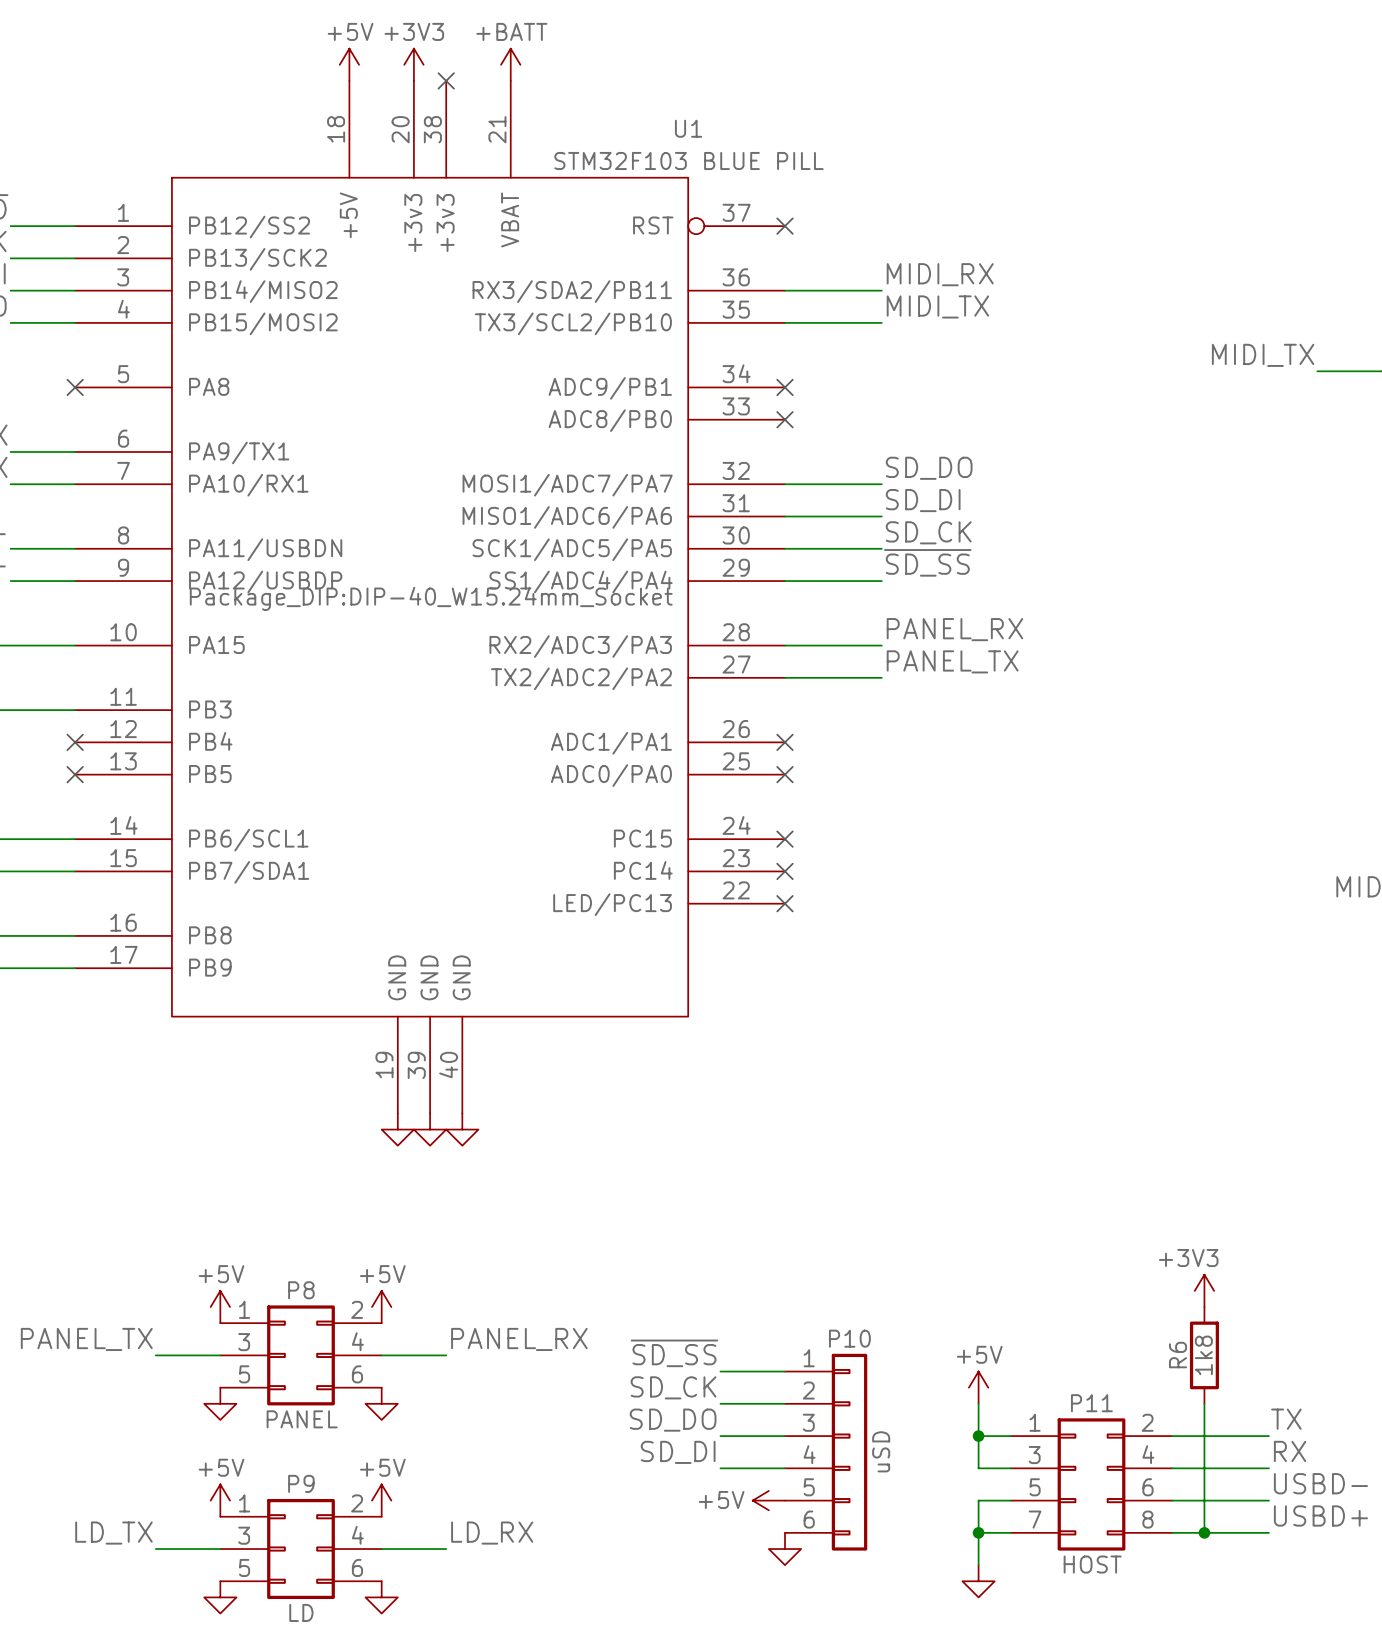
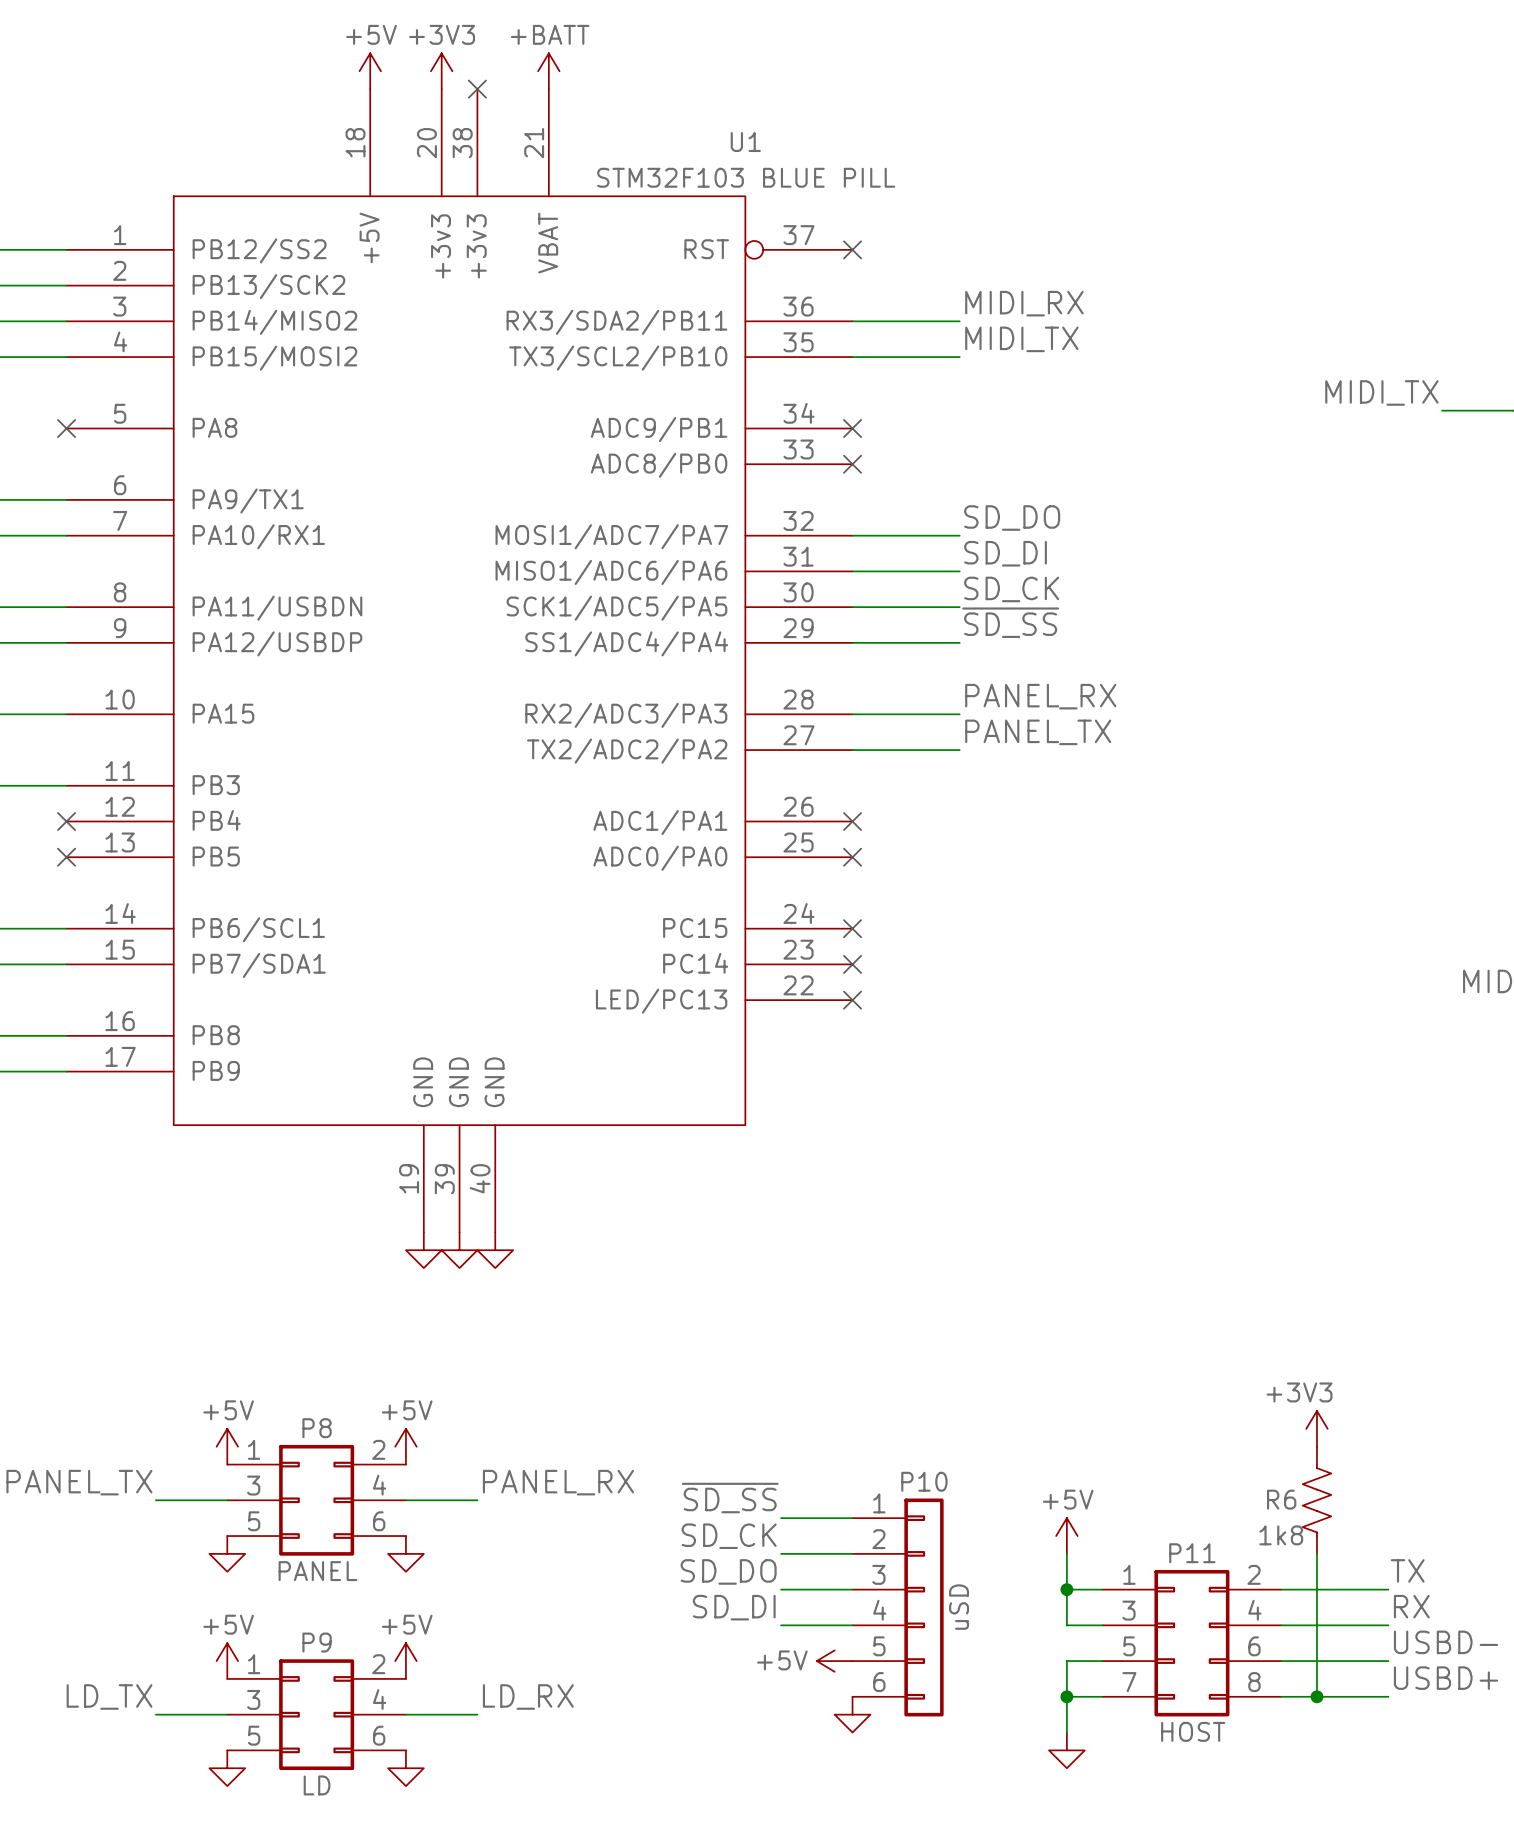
U1 text: Package_DIP:DIP-40_W15.24mm_Socket (431, 598) -> none
R6 symbol: [1189, 1307, 1219, 1404] -> [1302, 1446, 1332, 1554]
R6 value position: 1k8 (1203, 1355) -> 1k8 (1281, 1535)

